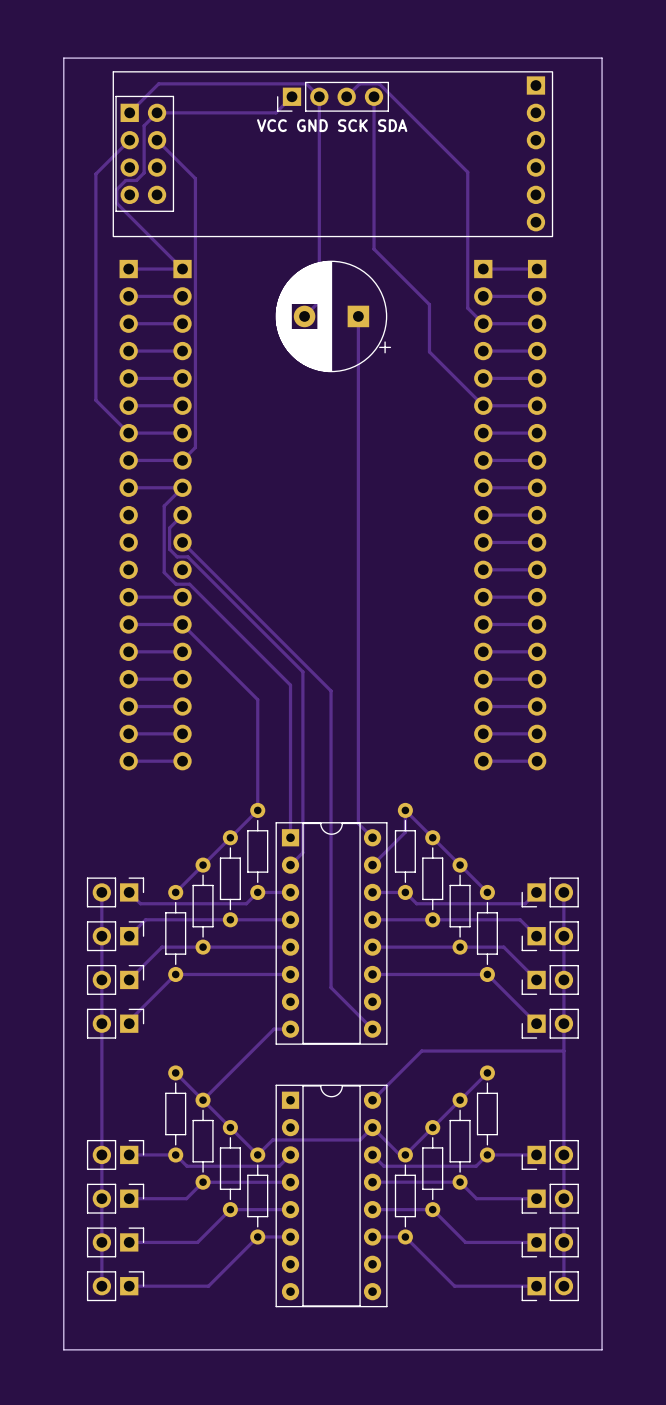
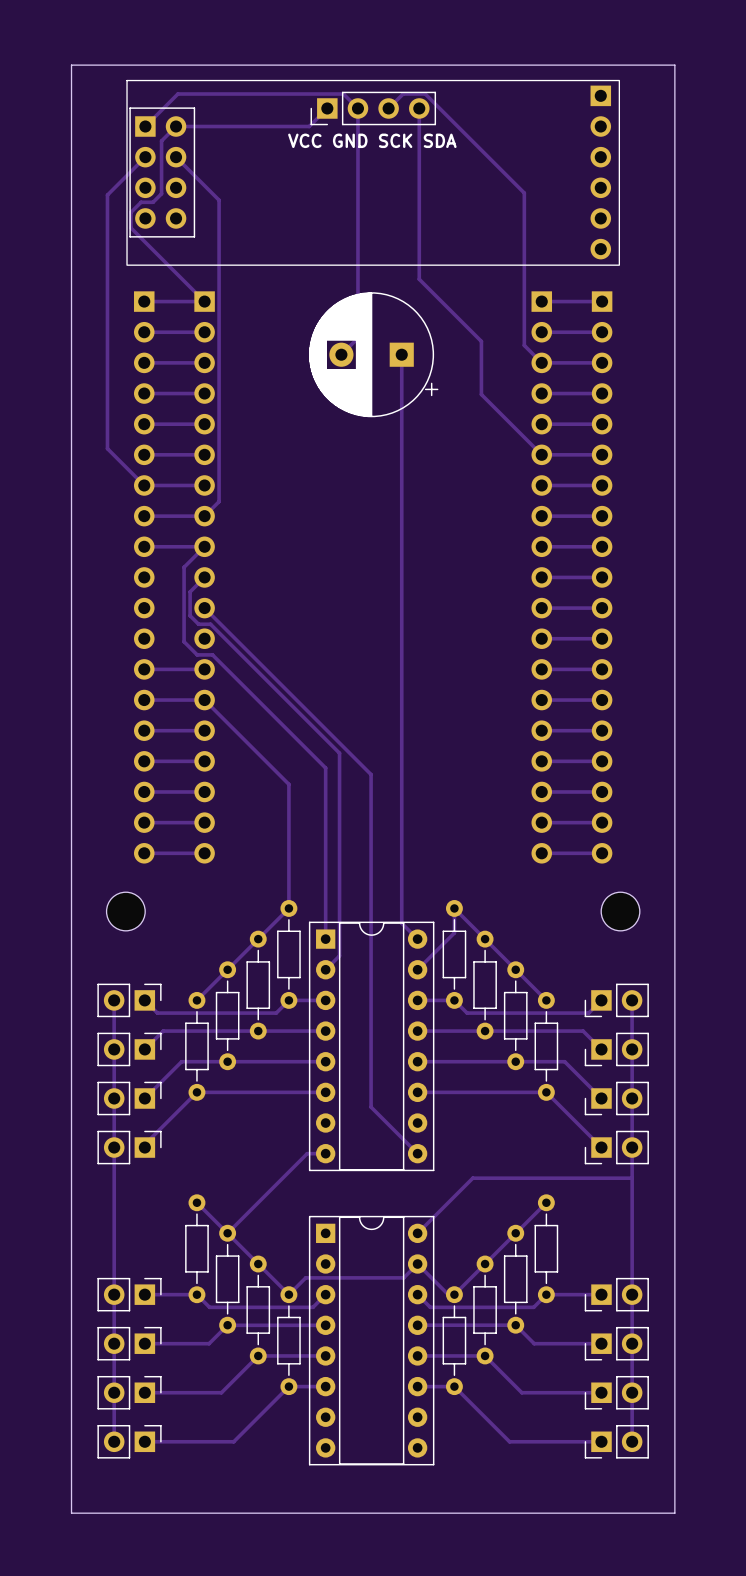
part: none -> (125, 911)
part: none -> (620, 911)

